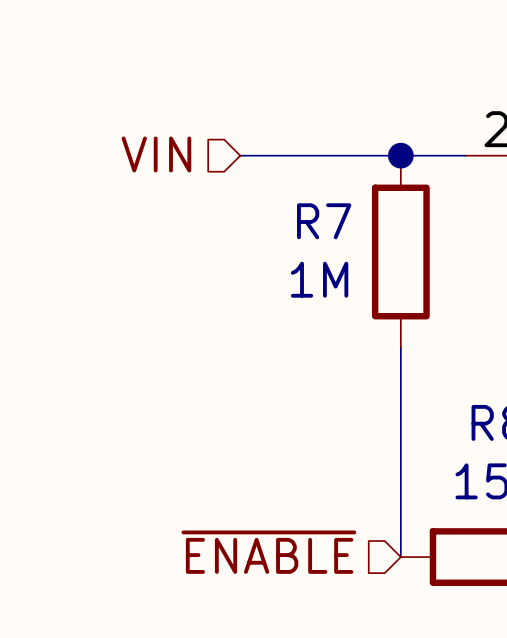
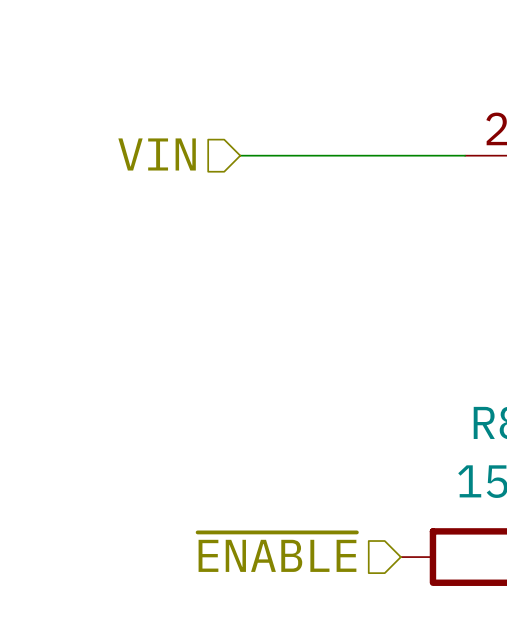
junction: (400, 155) -> none
R7: 1M (400, 252) -> none
wire: (400, 348) (400, 557) -> none

